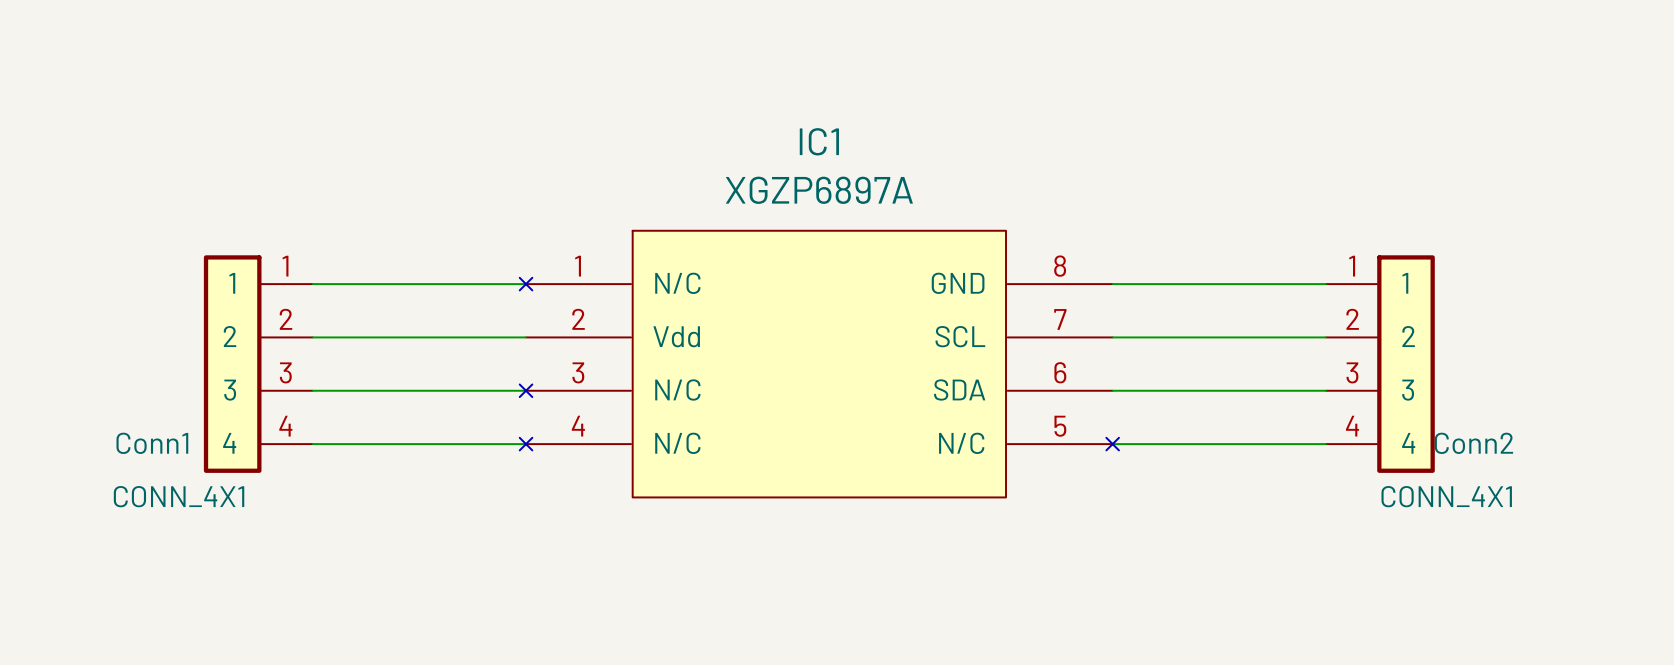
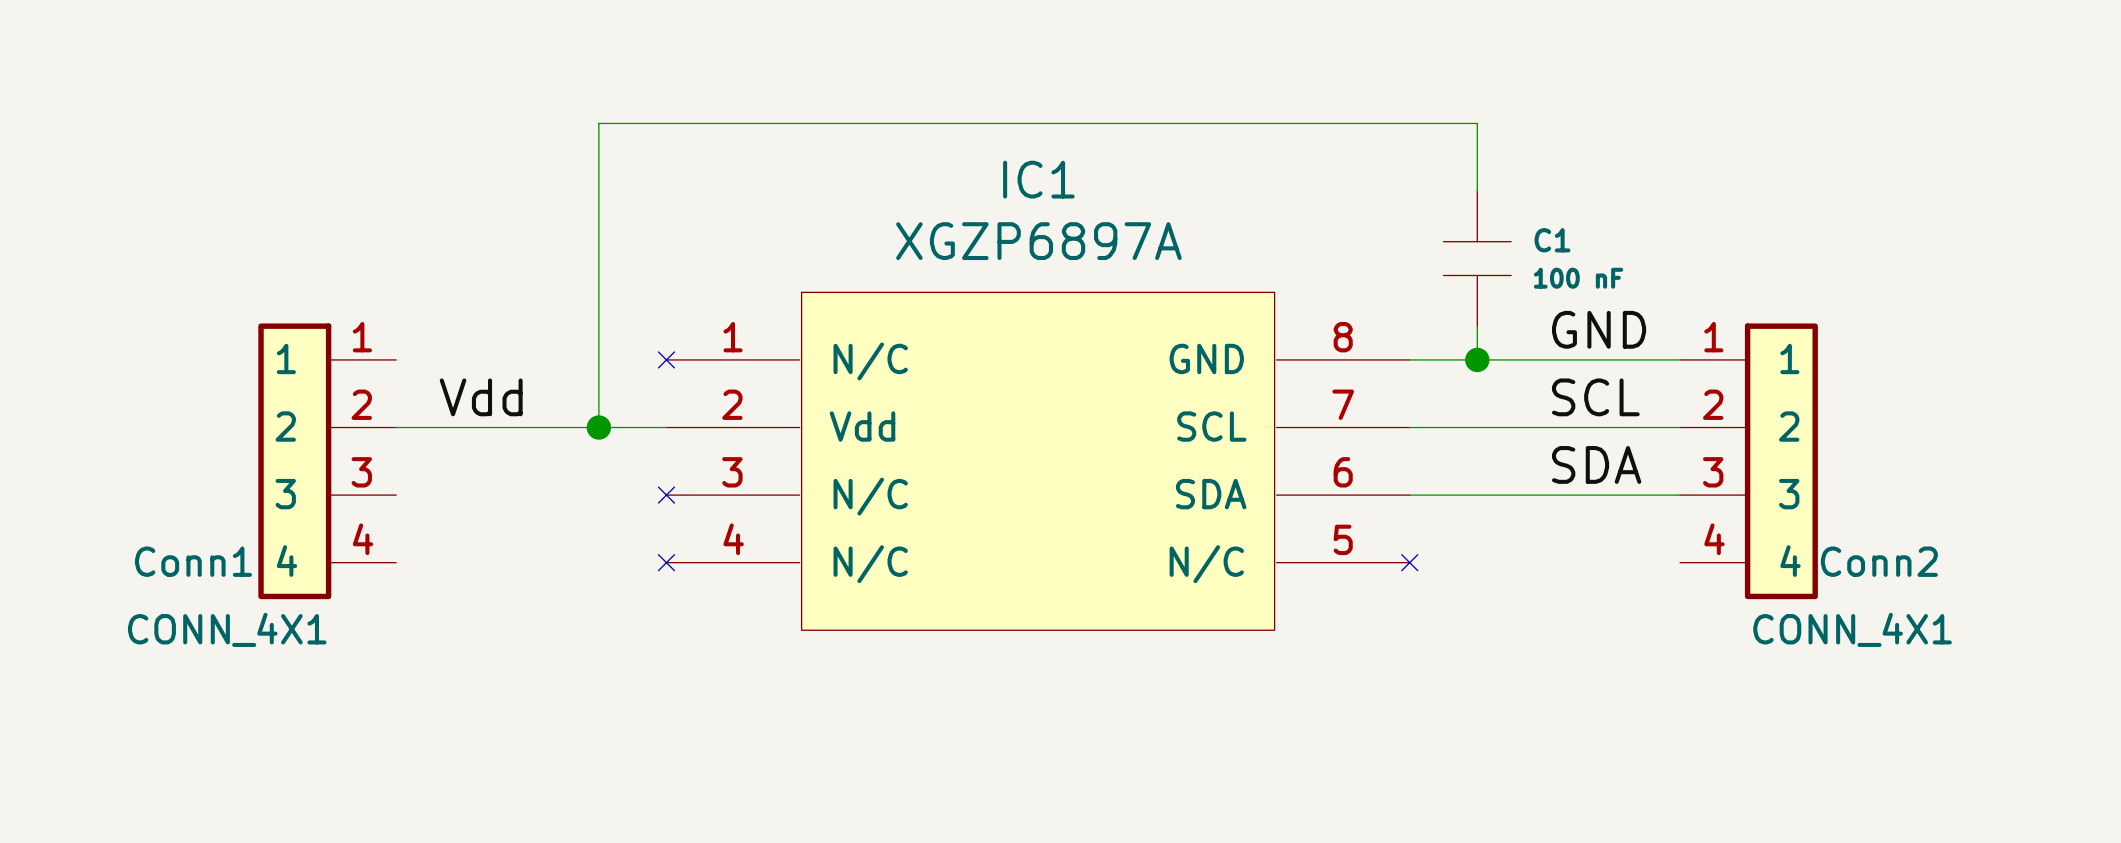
wire: none -> (1477, 191) (1477, 123) (598, 123) (598, 427)
C1: none -> 100 nF (1477, 258)
wire: none -> (1477, 326) (1477, 359)
label: none -> GND (1599, 329)
wire: (312, 284) (526, 284) -> none
junction: none -> (1477, 359)
label: none -> Vdd (481, 397)
label: none -> SCL (1595, 397)
junction: none -> (598, 427)
label: none -> SDA (1596, 464)
wire: (312, 390) (526, 390) -> none
wire: (312, 444) (526, 444) -> none
wire: (1112, 444) (1326, 444) -> none

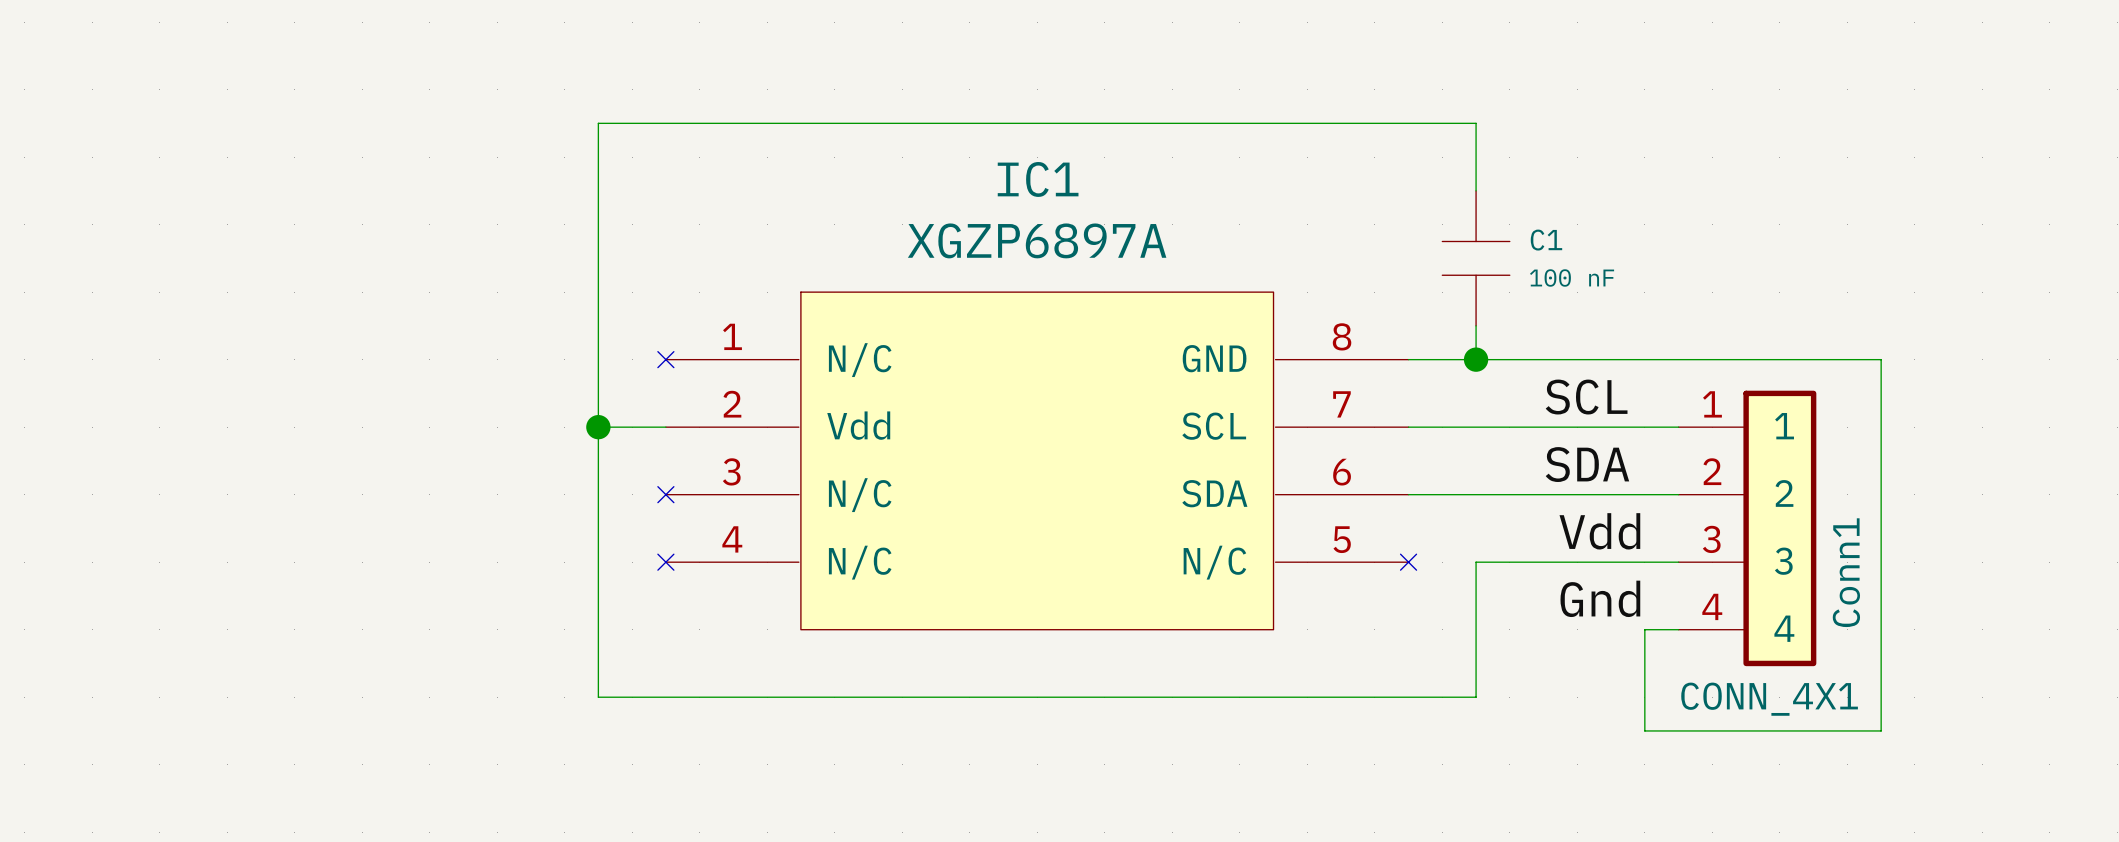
label: GND (1599, 329) -> none
wire: none -> (1678, 359) (1881, 359) (1881, 730) (1644, 730) (1644, 629) (1678, 629)
label: Vdd (481, 397) -> none
wire: (396, 427) (598, 427) -> (1678, 562) (1476, 562) (1476, 697) (598, 697) (598, 427)
Conn1 flip: as is (294, 461) -> left-right (1779, 528)
Conn1 position: (327, 461) -> (1747, 528)
Conn2: CONN_4X1 (1748, 461) -> none
label: none -> Vdd (1599, 531)
Conn1 name position: Conn1 (193, 561) -> Conn1 (1846, 572)
label: none -> Gnd (1600, 598)

